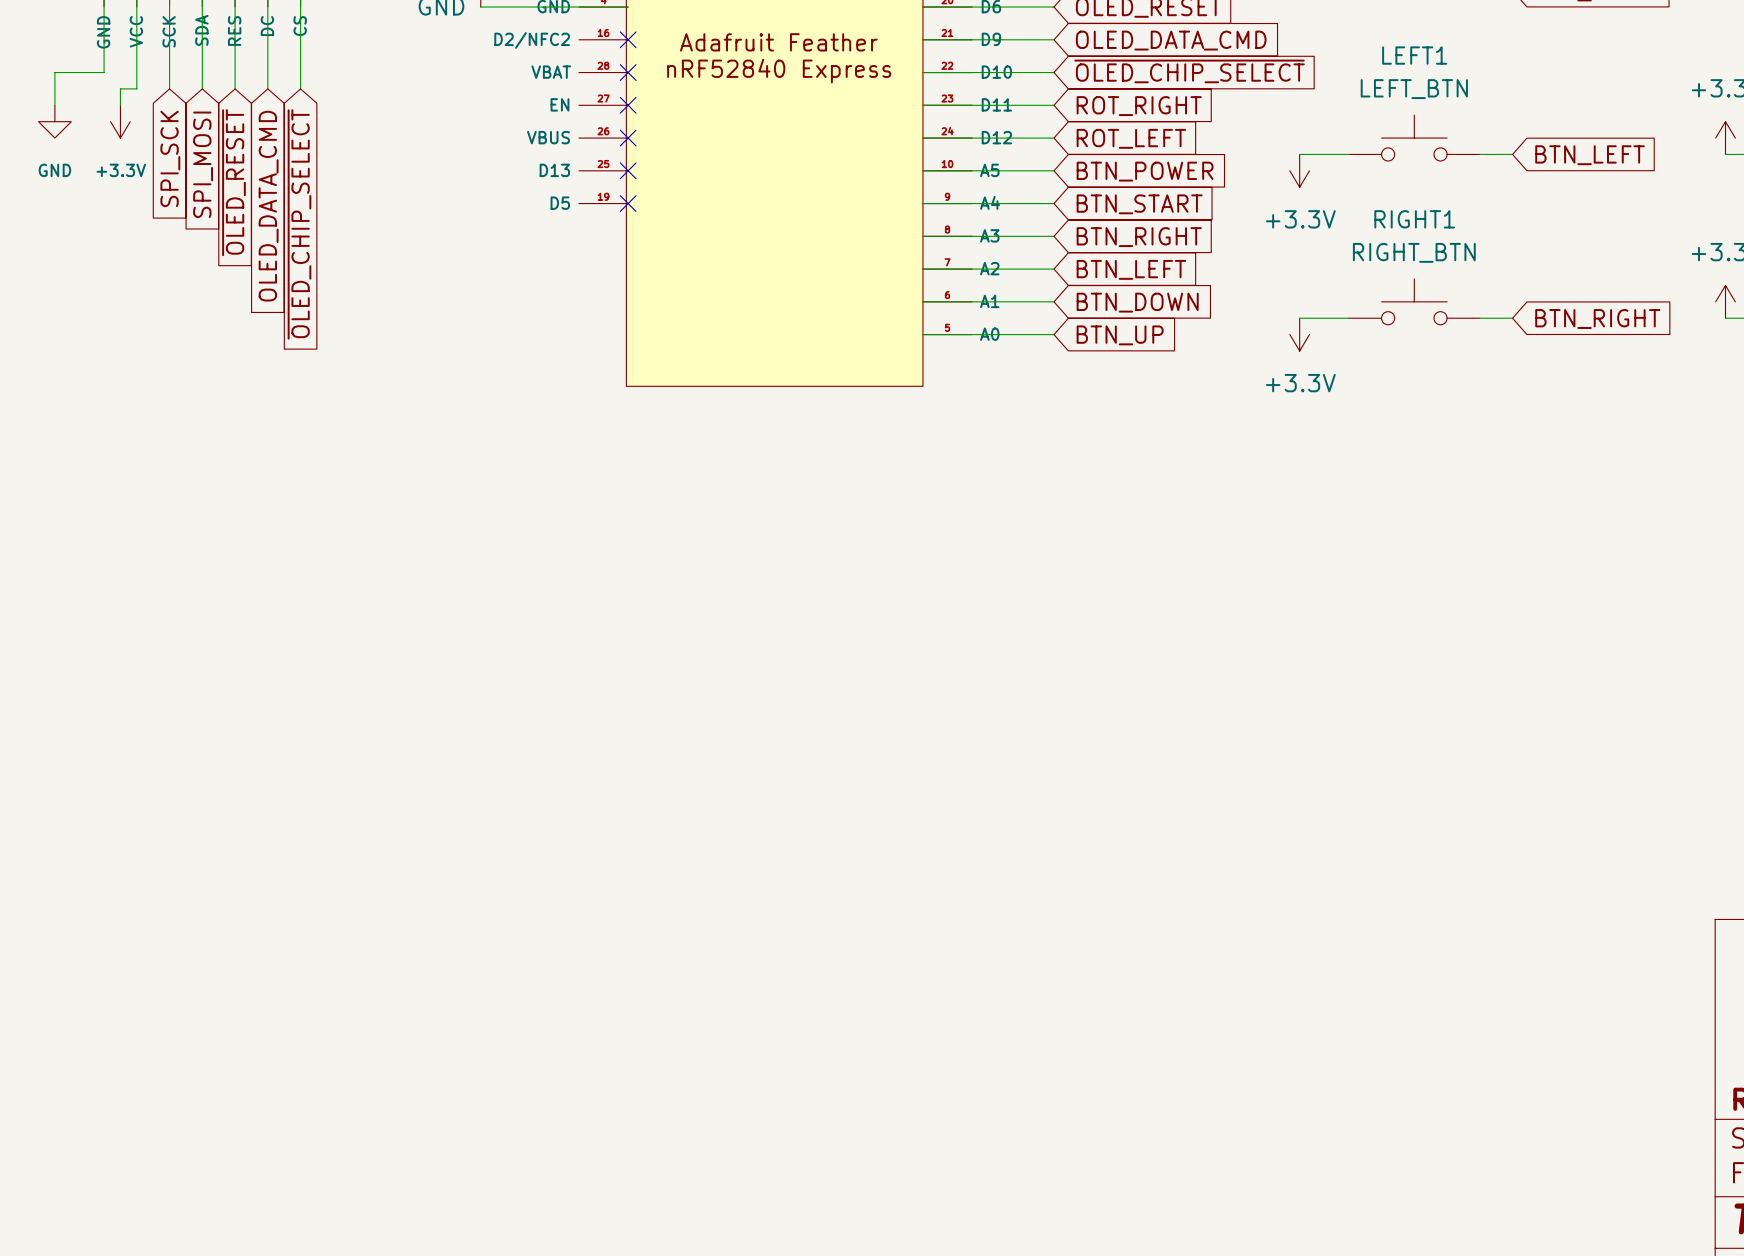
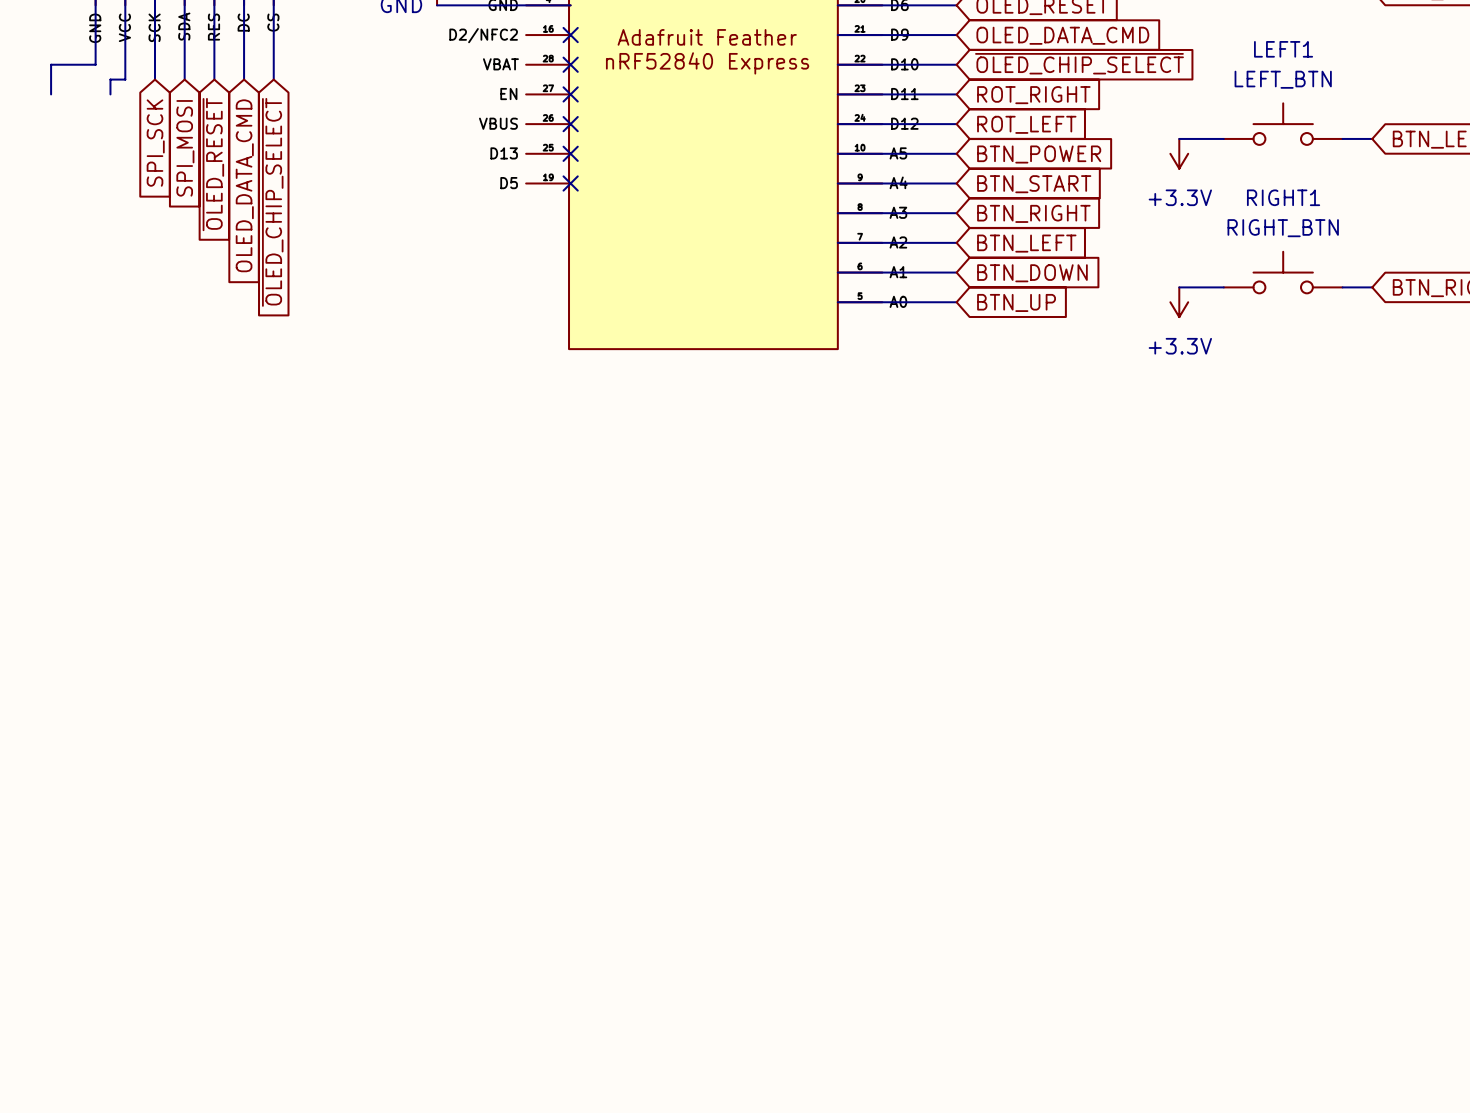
power symbol: GND (54, 121) -> none
power symbol: +3.3V (120, 121) -> none

